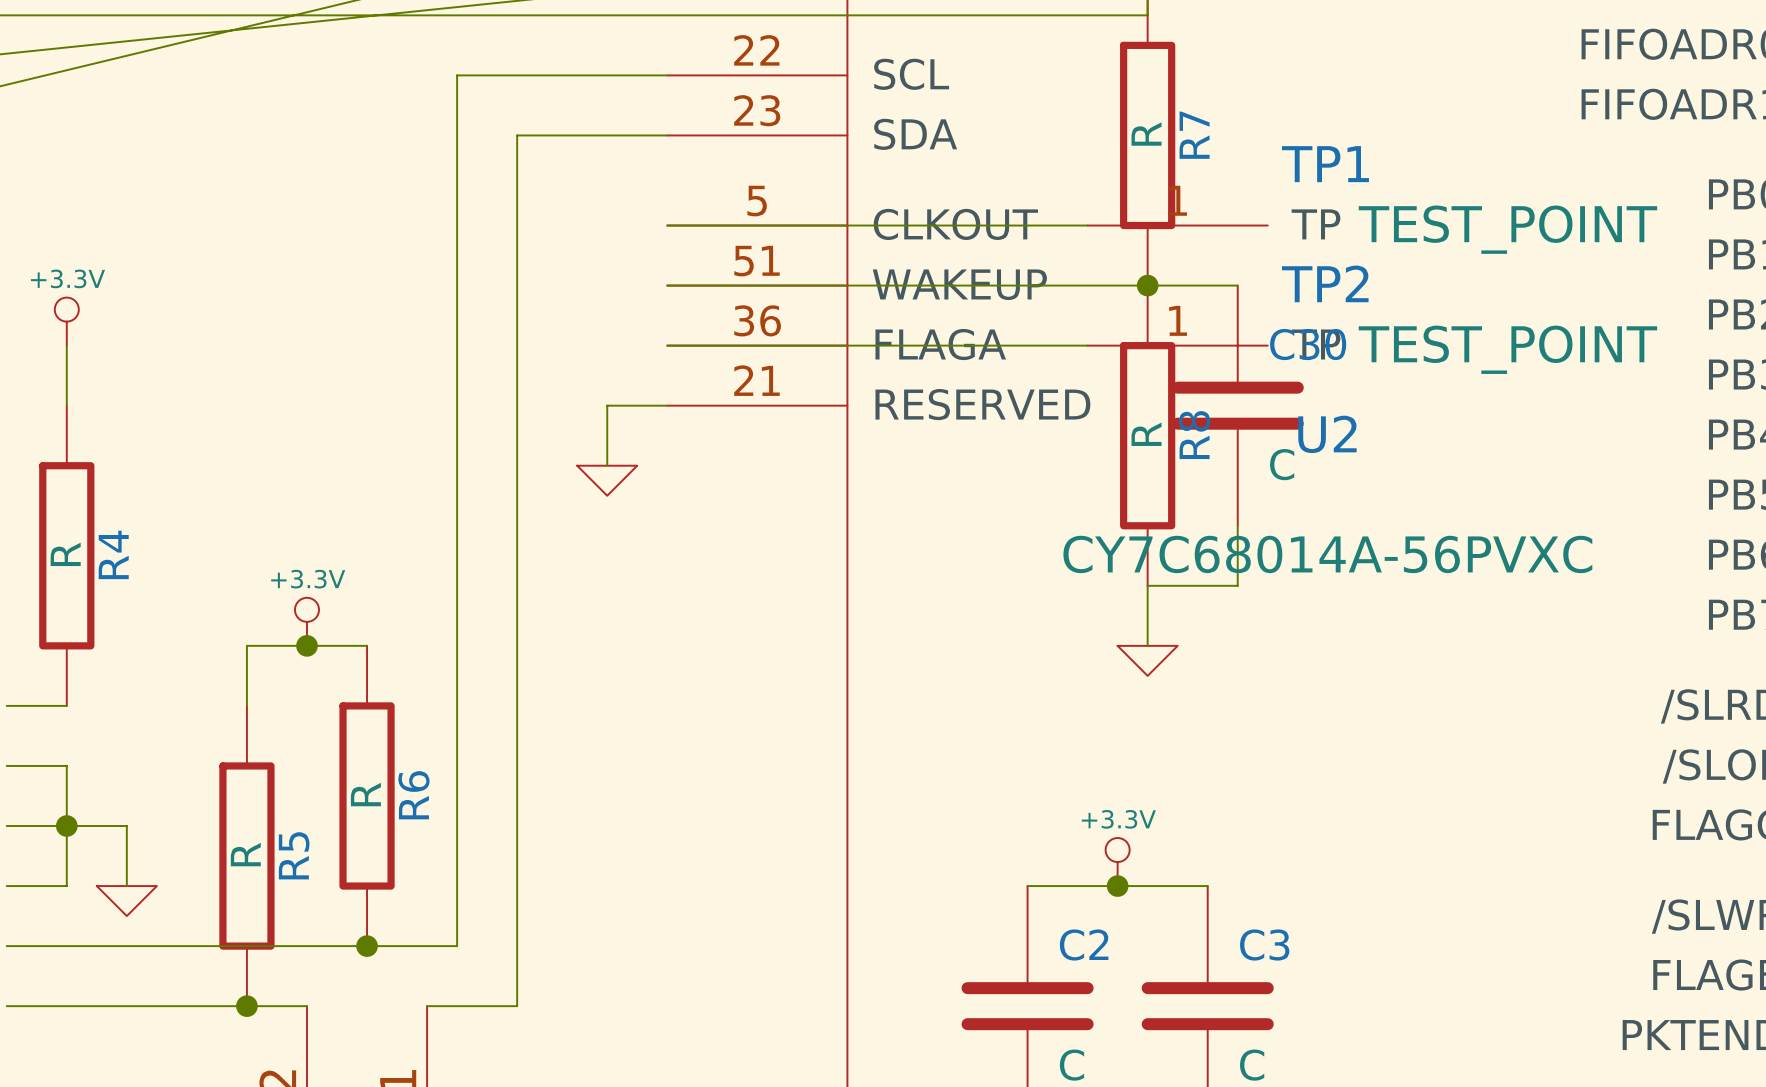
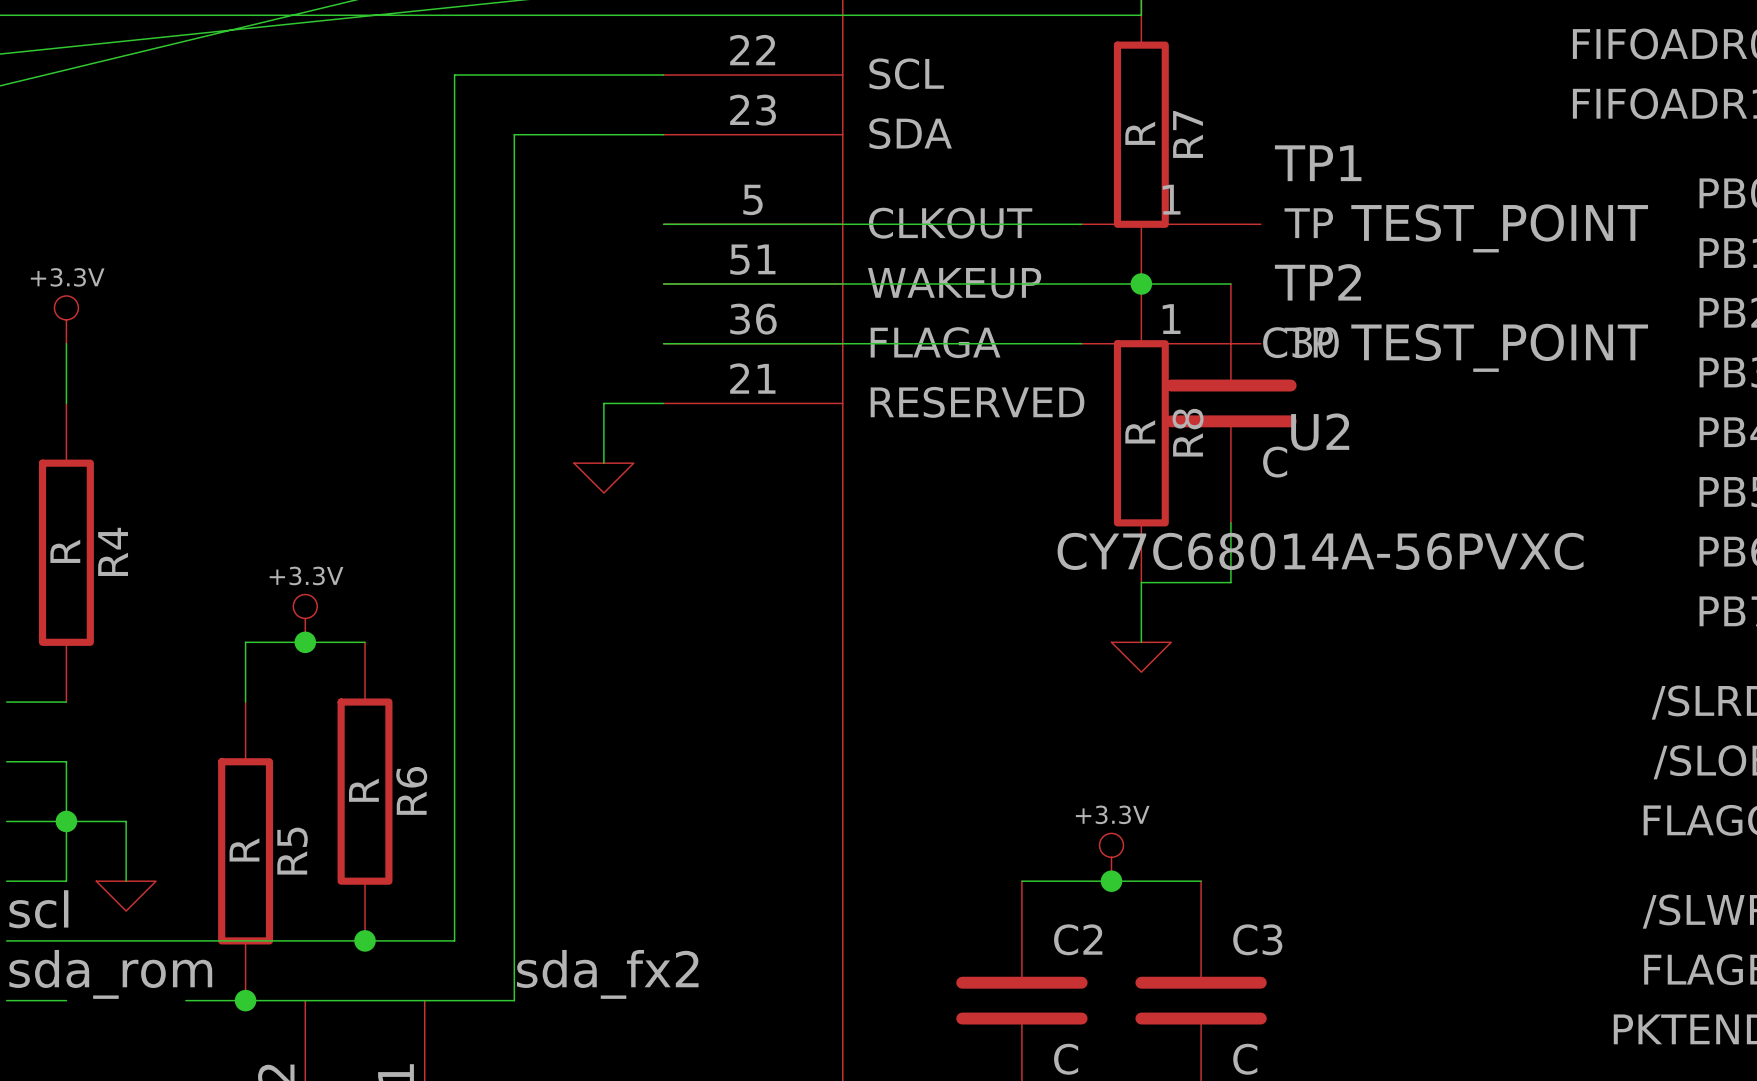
label: none -> scl (38, 909)
label: none -> sda_rom (110, 974)
label: none -> sda_fx2 (607, 974)
wire: (66, 1006) (186, 1006) -> (305, 1000) (424, 1000)

